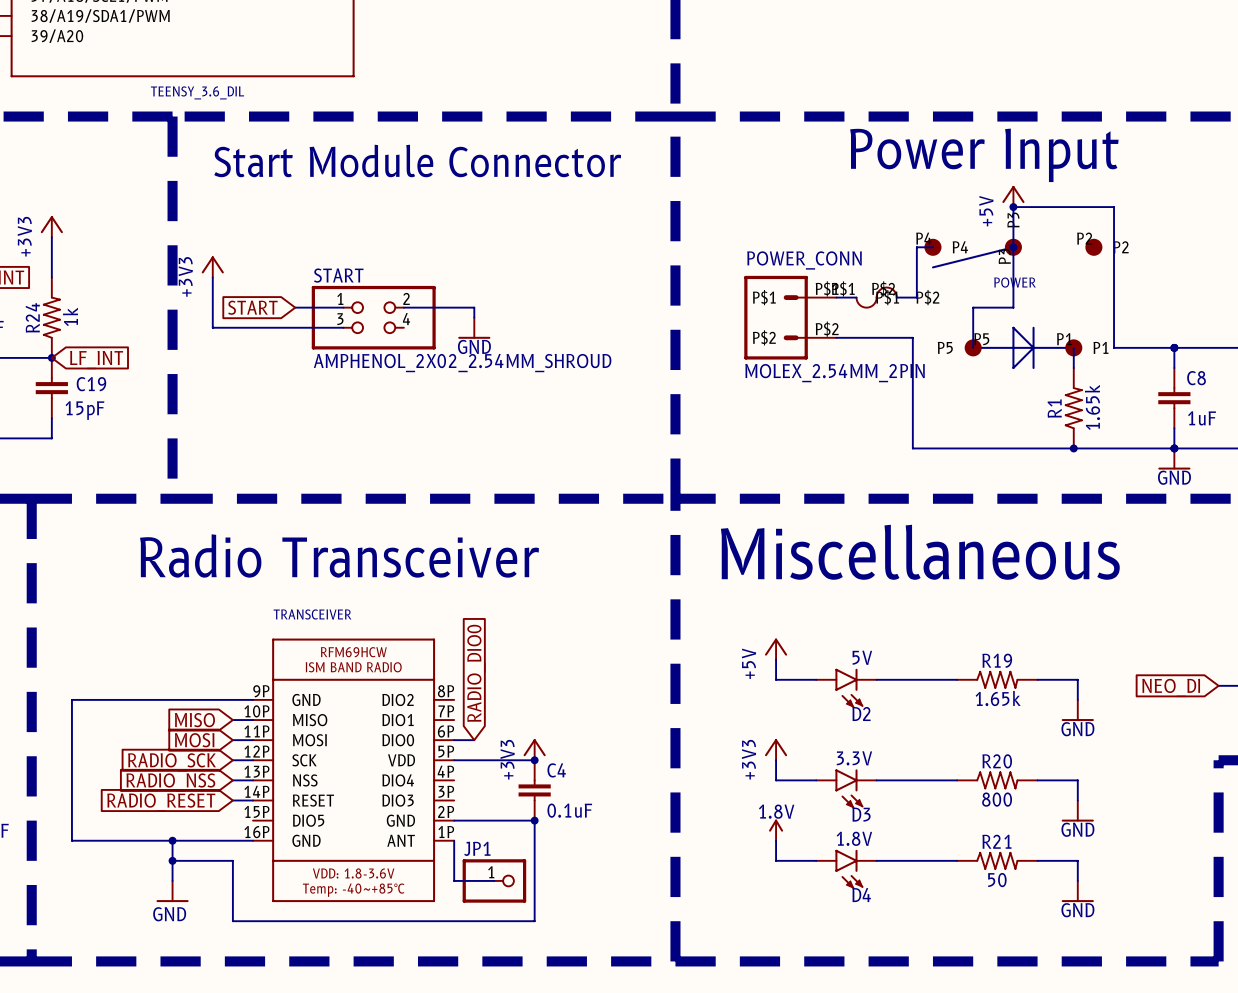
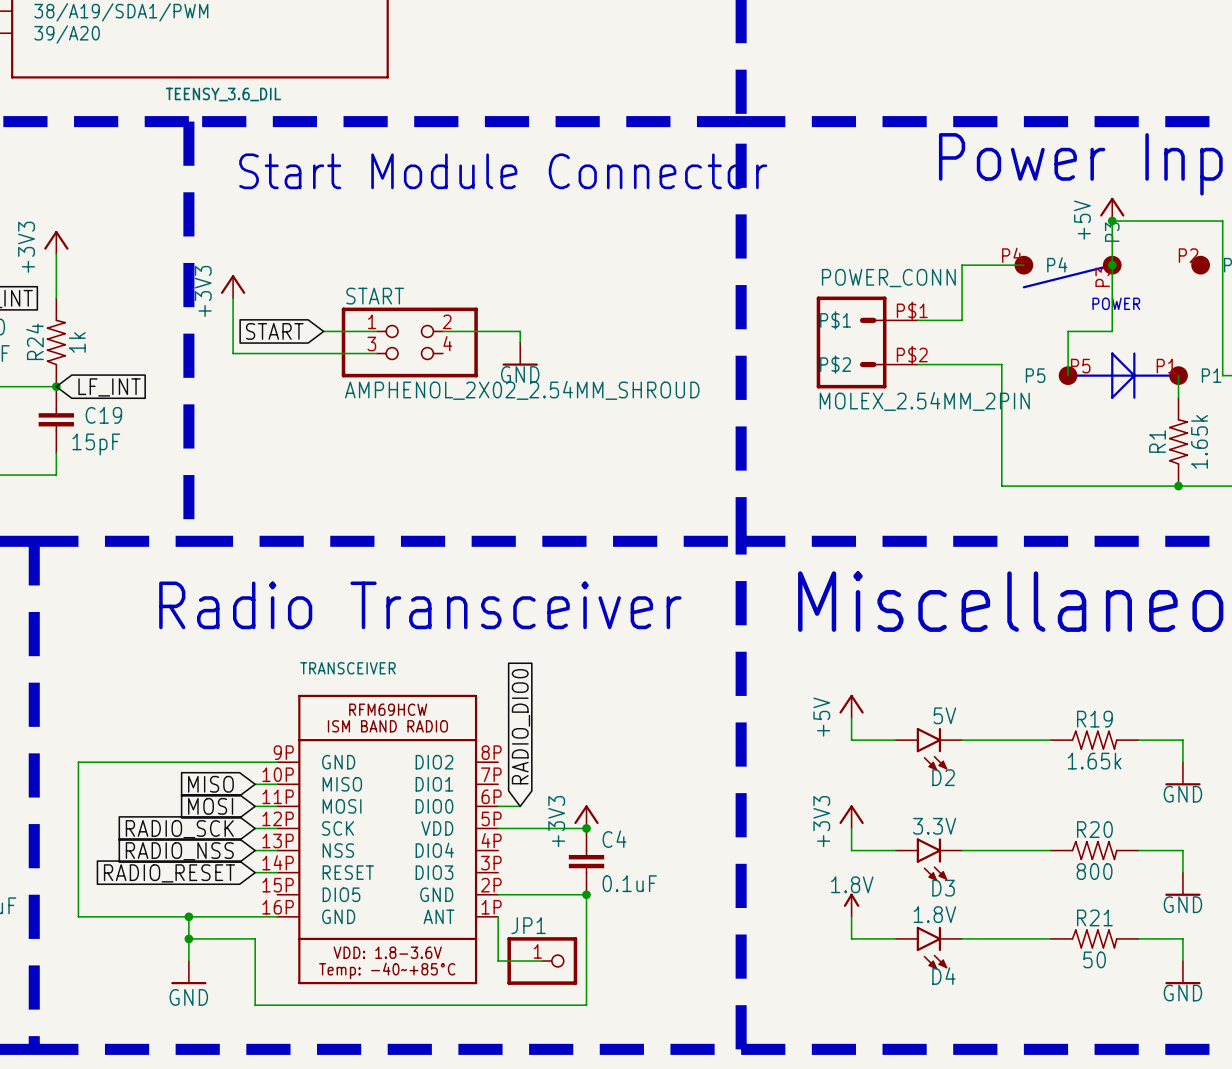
wire: (916, 247) (916, 297) (896, 297) -> (1006, 265) (962, 265) (962, 320) (939, 320)
part: (876, 297) -> none

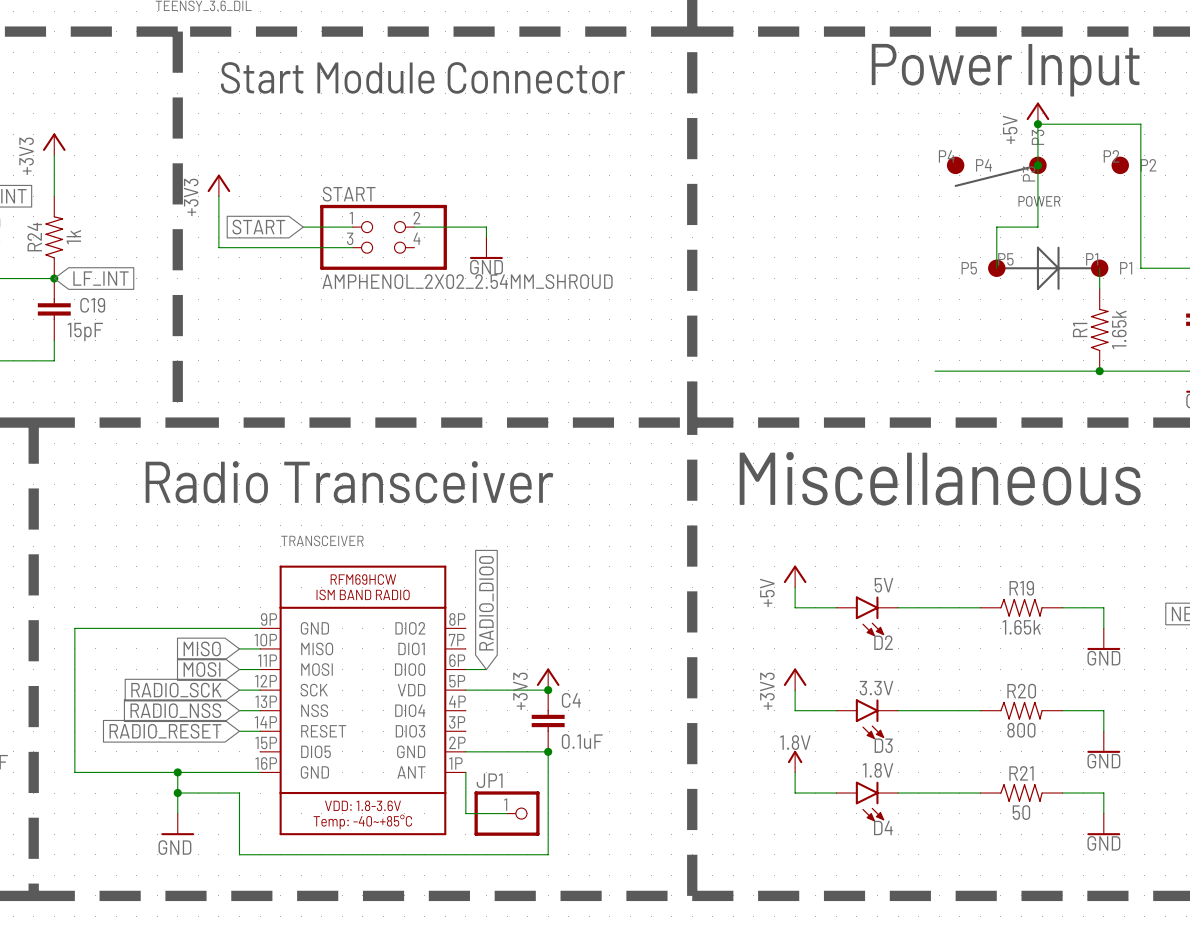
wire: (1023, 265) (962, 265) (962, 320) (917, 320) -> none
POWER_CONN: MOLEX_2.54MM_2PIN (867, 342) -> none
wire: (917, 364) (1001, 364) (1001, 486) -> none

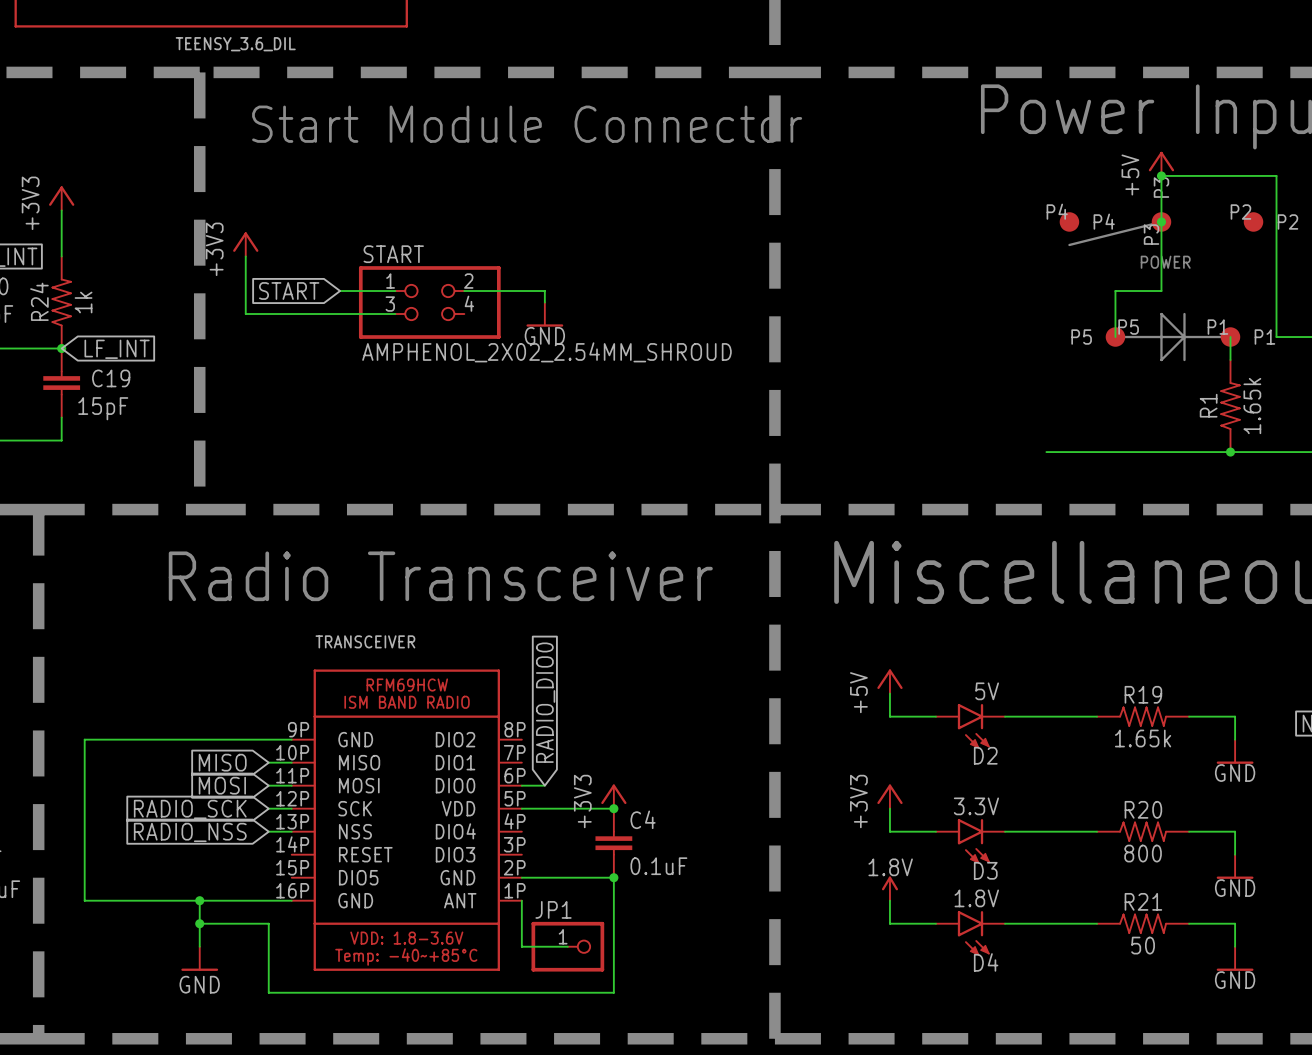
global label: RADIO_RESET (165, 731) -> none
wire: (239, 731) (260, 731) -> none

